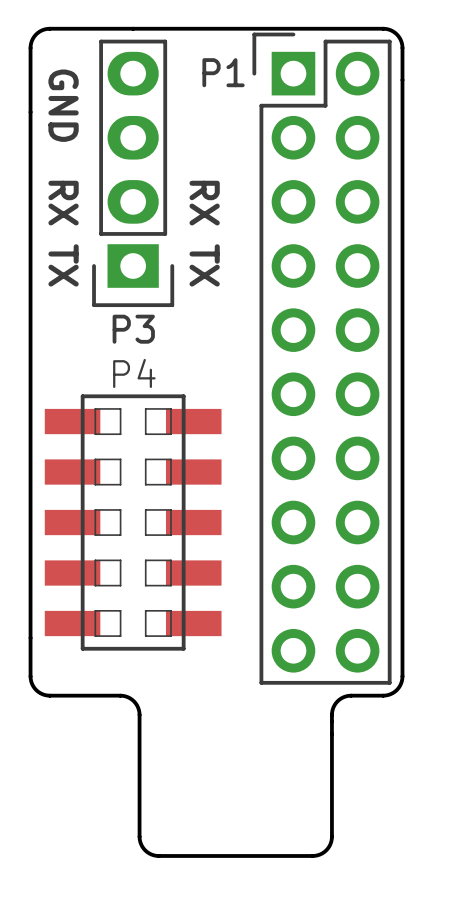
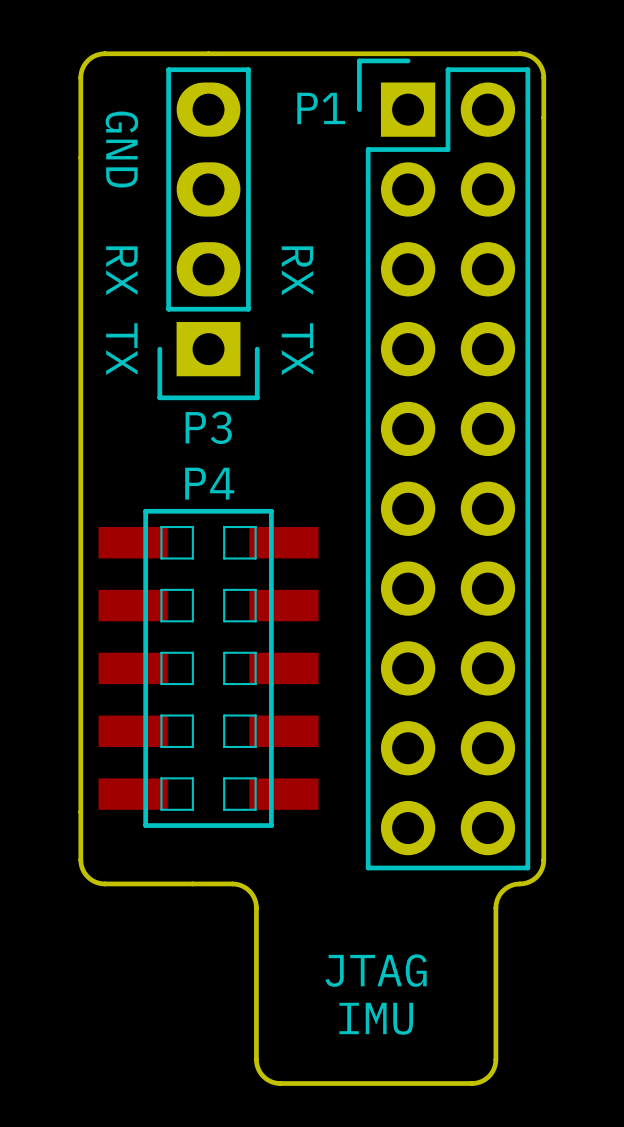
board edge: (120, 695) (133, 701) (139, 712) (141, 844) (145, 850) (153, 855) (190, 855) -> (192, 883) (238, 884) (249, 890) (254, 898) (256, 907) (256, 1062) (263, 1076) (271, 1081) (280, 1083)
board edge: (383, 695) (346, 696) (337, 701) (333, 707) (331, 839) (326, 850) (312, 855) -> (519, 883) (510, 885) (502, 890) (496, 904) (495, 1059) (494, 1068) (488, 1076) (478, 1082) (432, 1083)
text: none -> JTAG (376, 970)
text: none -> IMU (376, 1018)

